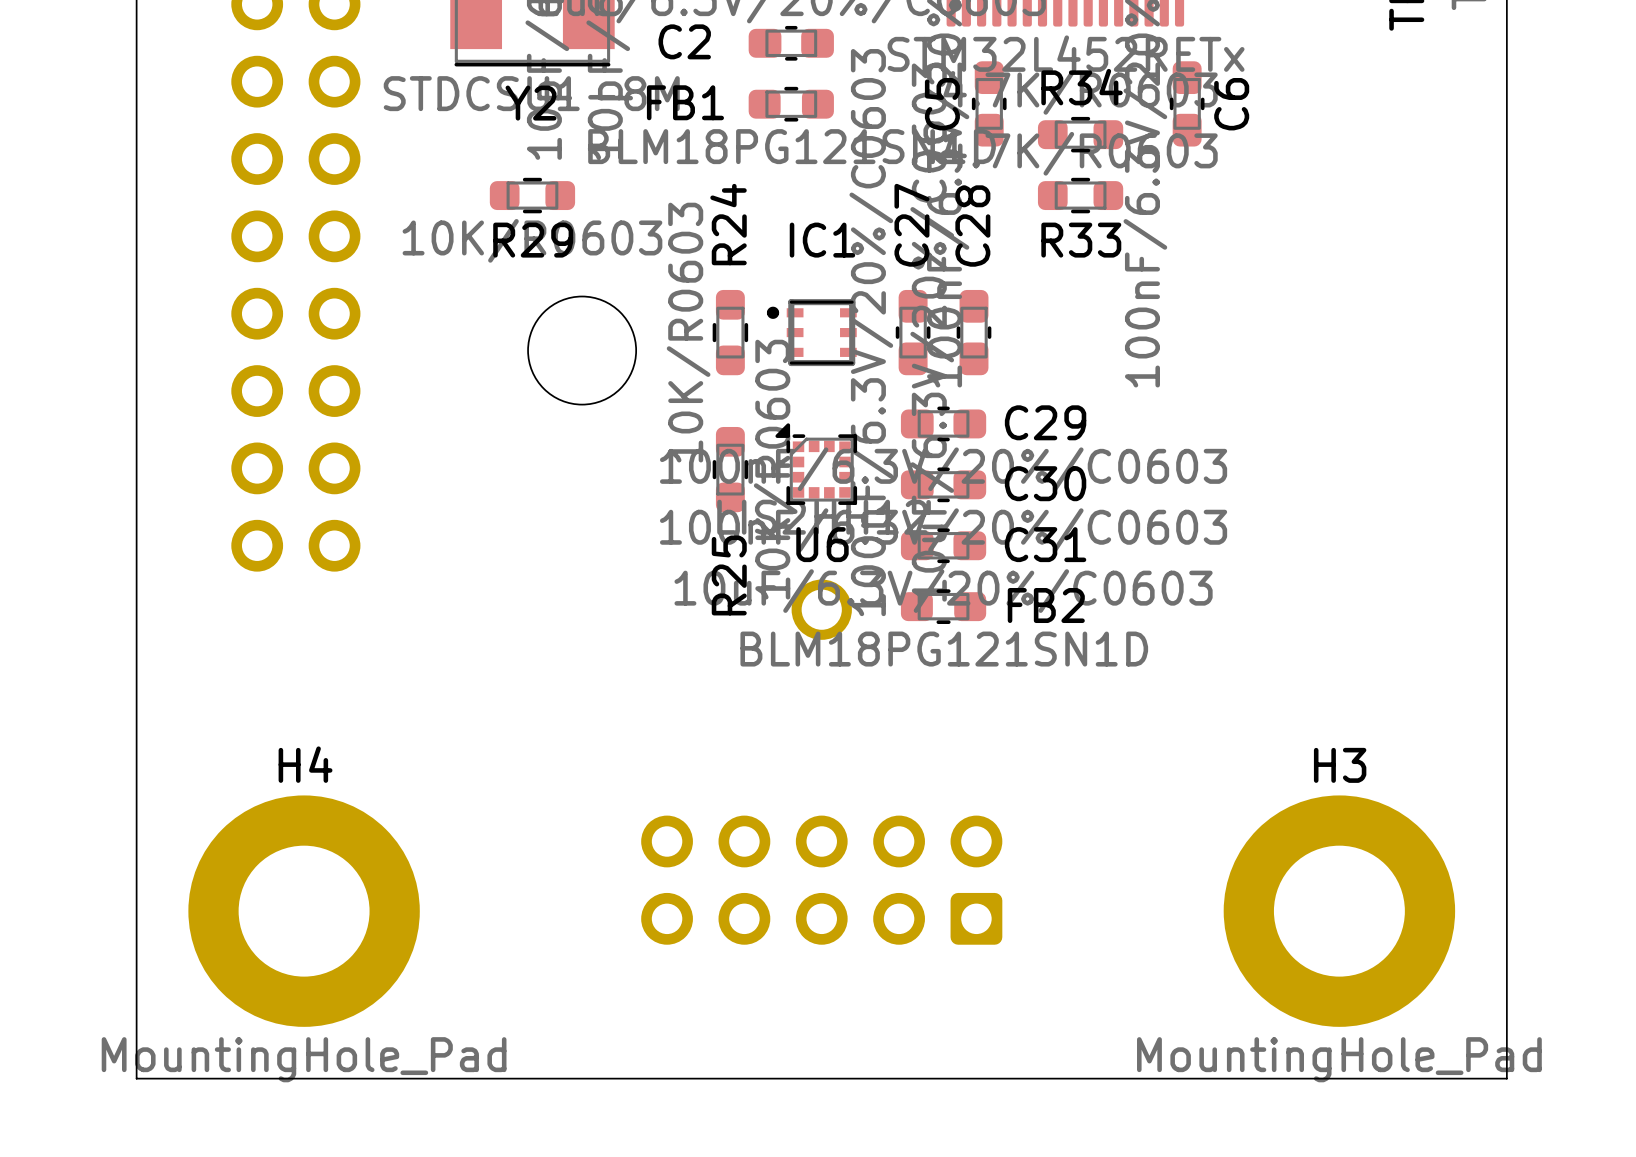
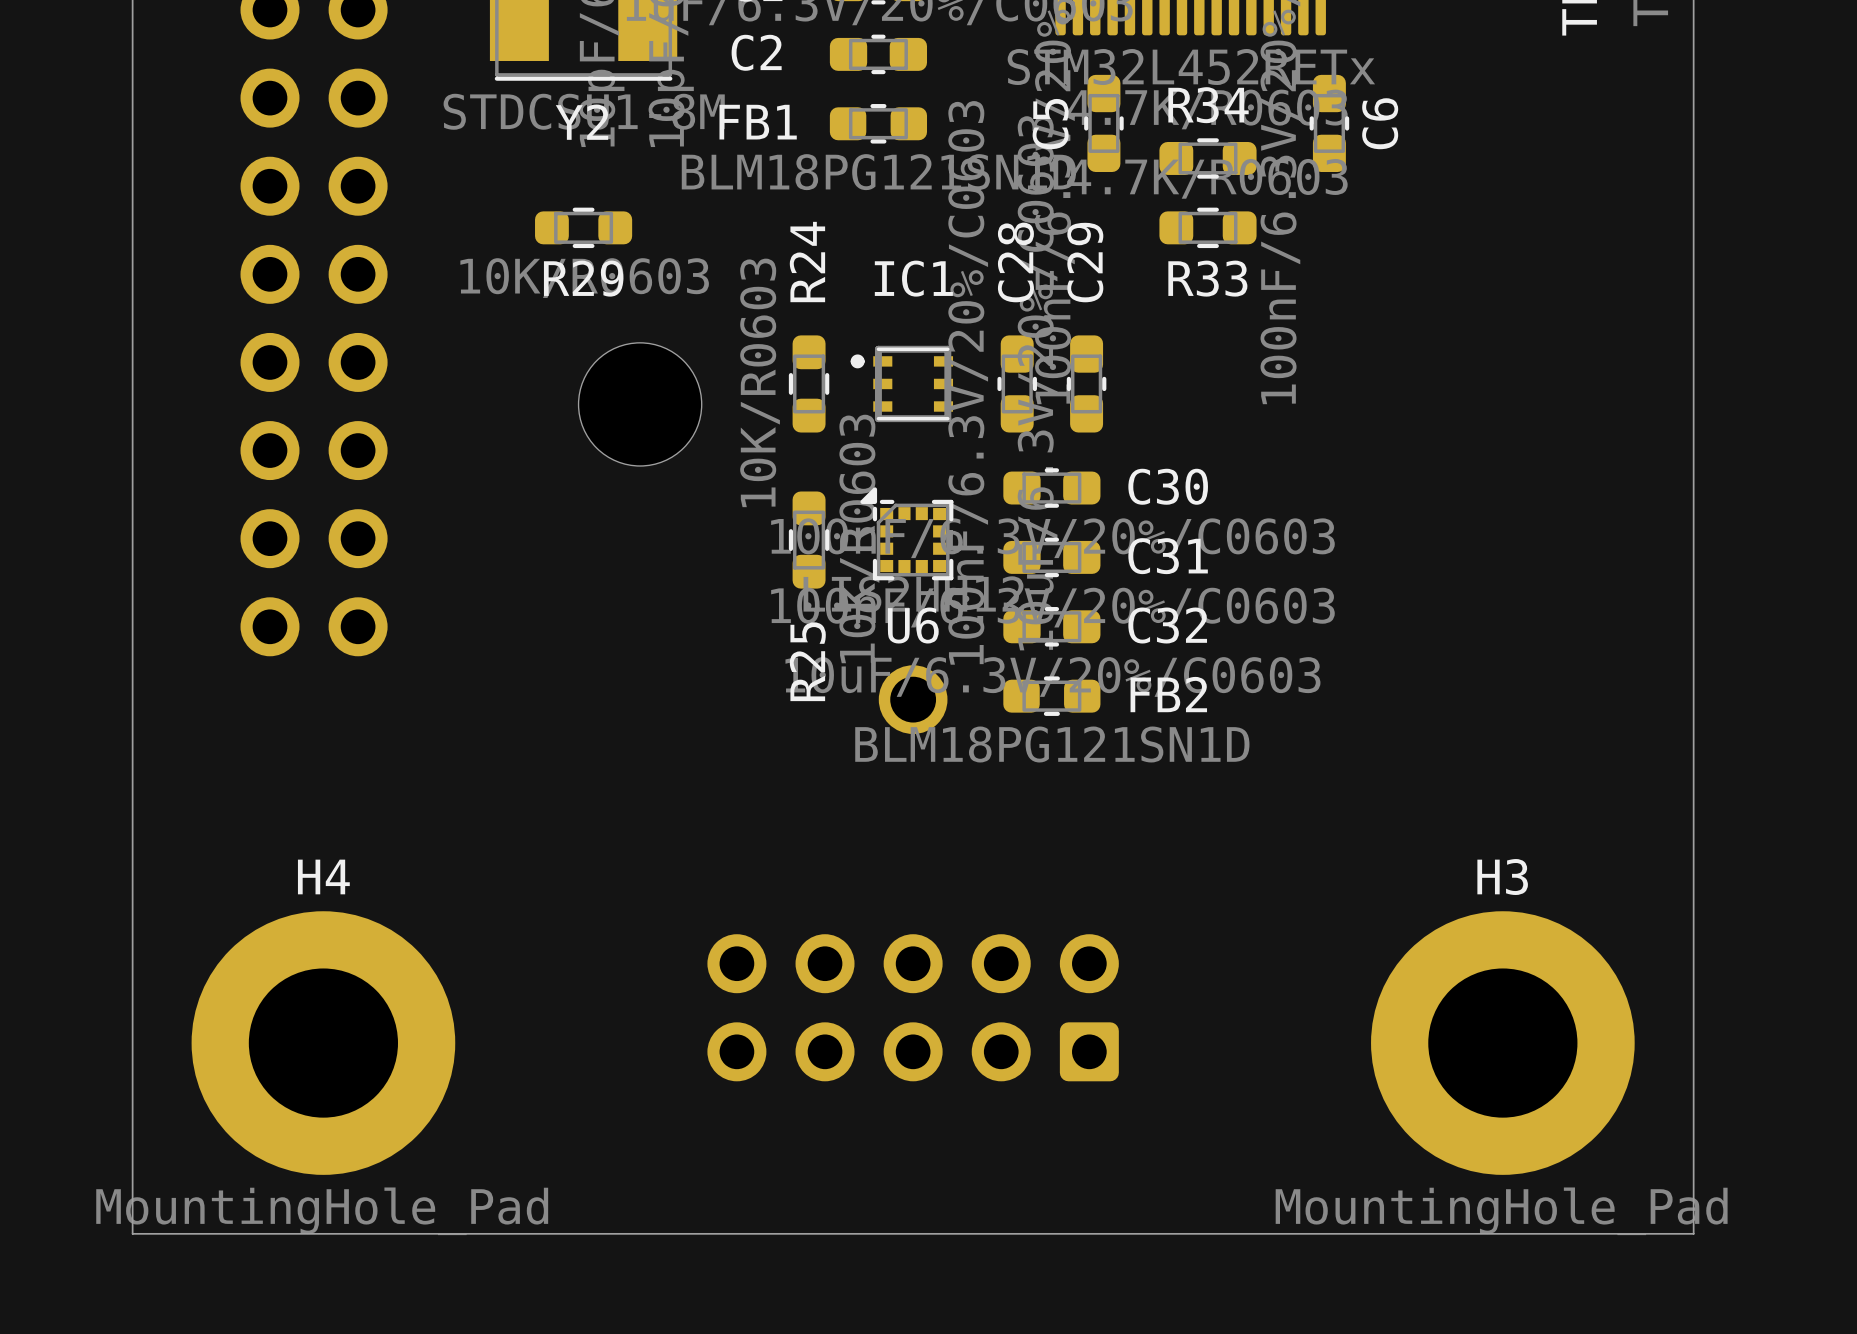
C27 name: C27 (911, 225) -> C28 (1015, 262)
C28 name: C28 (972, 226) -> C29 (1085, 262)
C29 name: C29 (1045, 422) -> C30 (1168, 486)
C30 name: C30 (1045, 483) -> C31 (1168, 556)
C31 name: C31 (1045, 544) -> C32 (1167, 625)

